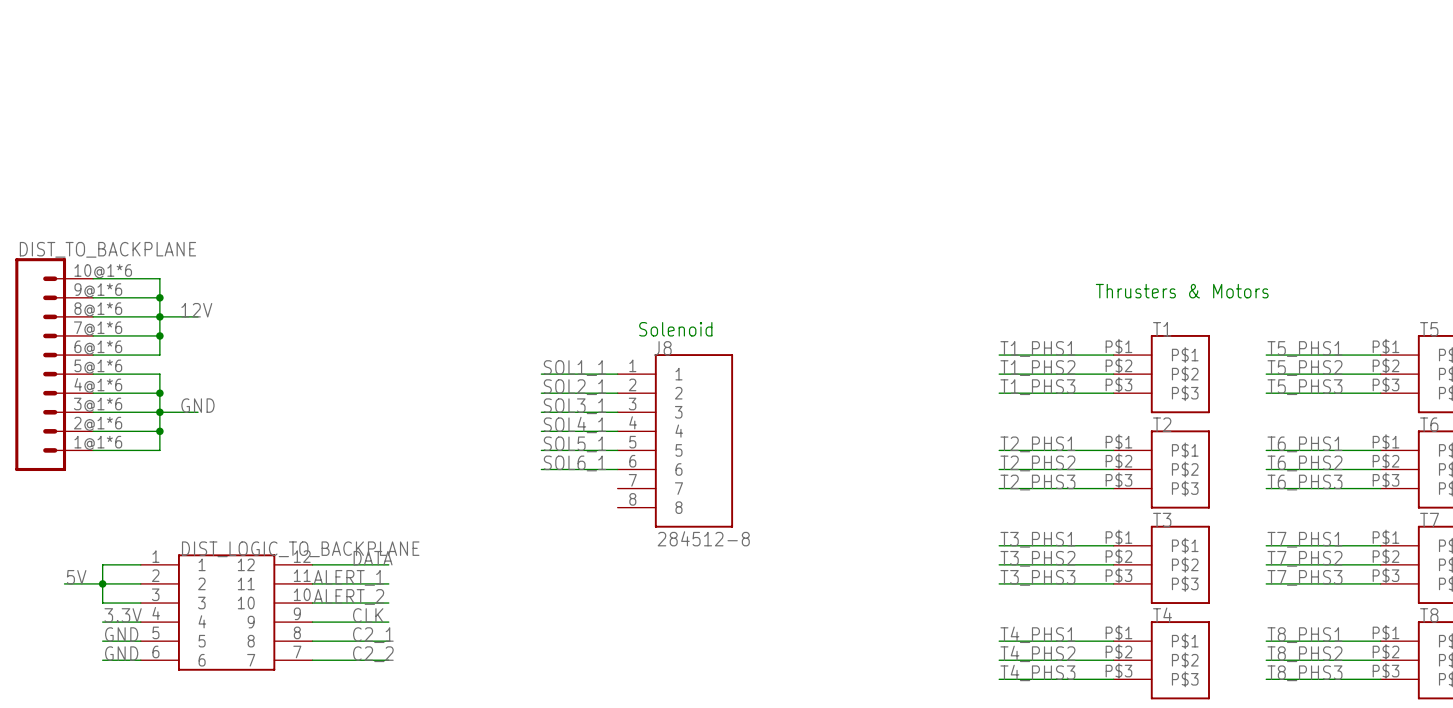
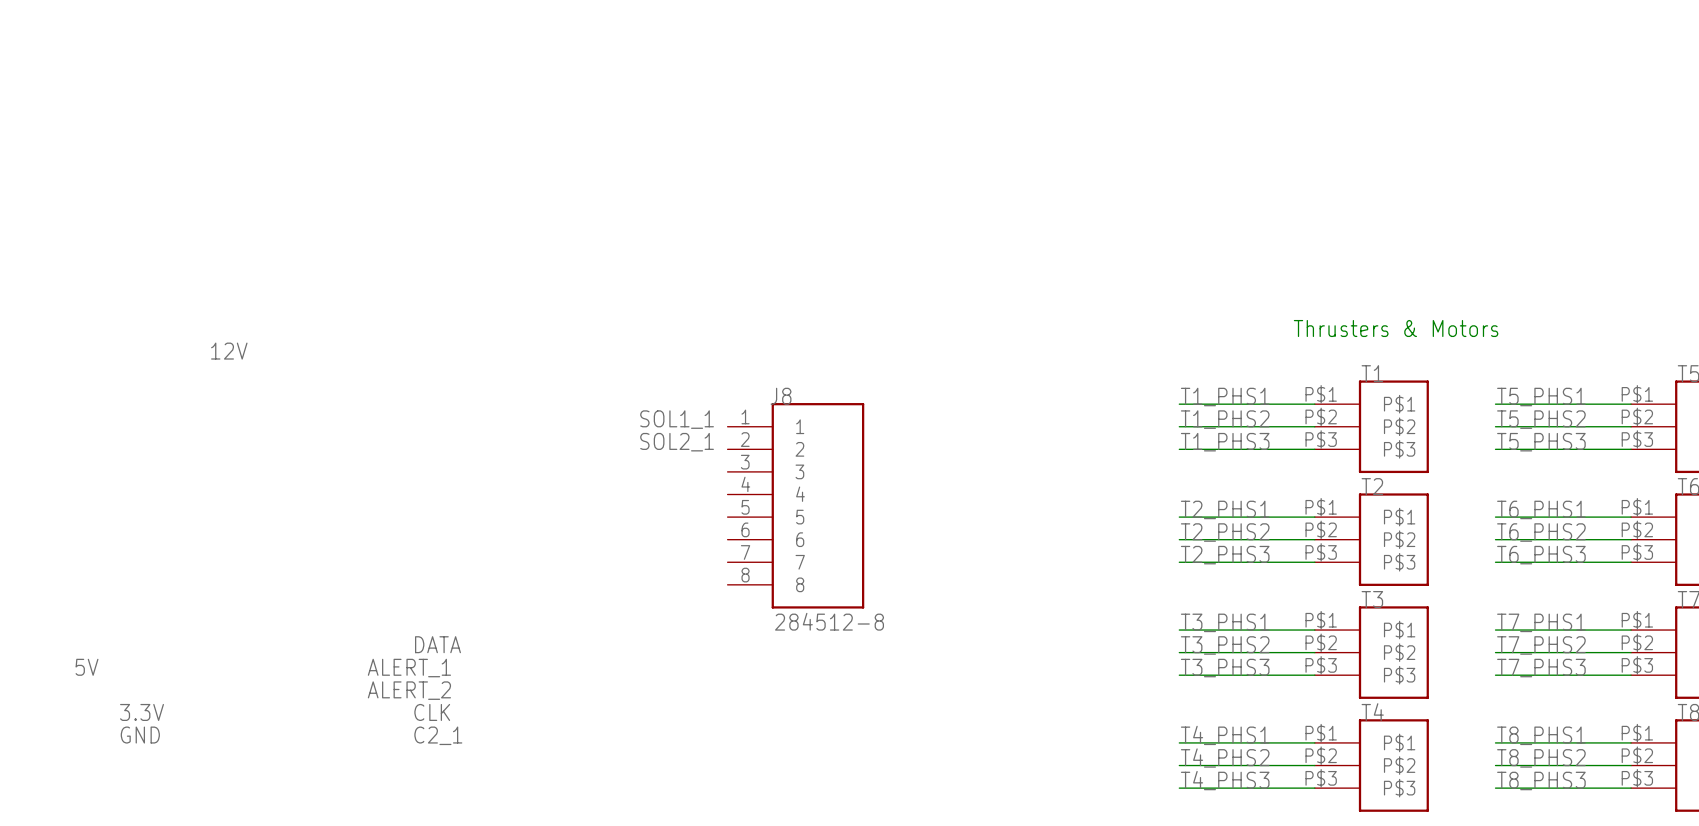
wire: (93, 278) (159, 278) (159, 355) (93, 355) -> none
wire: (93, 297) (159, 297) -> none
junction: (159, 297) -> none
wire: (93, 316) (198, 316) -> none
junction: (159, 316) -> none
text: Solenoid (675, 329) -> none
wire: (93, 335) (159, 335) -> none
junction: (159, 335) -> none
DIST_TO_BACKPLANE: (54, 364) -> none
wire: (93, 374) (159, 374) (159, 450) (93, 450) -> none
wire: (541, 374) (617, 374) -> none
wire: (93, 393) (159, 393) -> none
junction: (159, 393) -> none
wire: (541, 393) (617, 393) -> none
label: GND (197, 405) -> none
label: SOL3_1 (574, 406) -> none
wire: (93, 412) (198, 412) -> none
junction: (159, 412) -> none
wire: (541, 412) (617, 412) -> none
label: SOL4_1 (574, 424) -> none
wire: (93, 431) (159, 431) -> none
junction: (159, 431) -> none
wire: (541, 431) (617, 431) -> none
label: SOL5_1 (574, 444) -> none
wire: (541, 450) (617, 450) -> none
label: SOL6_1 (574, 463) -> none
wire: (541, 469) (617, 469) -> none
wire: (140, 564) (102, 564) (102, 603) (140, 603) -> none
wire: (312, 564) (388, 564) -> none
wire: (64, 583) (140, 583) -> none
junction: (102, 583) -> none
wire: (312, 583) (388, 583) -> none
wire: (312, 603) (388, 603) -> none
DIST_LOGIC_TO_BACKPLANE: (226, 612) -> none
wire: (102, 622) (140, 622) -> none
wire: (312, 622) (388, 622) -> none
wire: (102, 641) (140, 641) -> none
wire: (312, 641) (388, 641) -> none
label: GND (121, 653) -> none
label: C2_2 (373, 654) -> none
wire: (102, 660) (140, 660) -> none
wire: (312, 660) (388, 660) -> none

